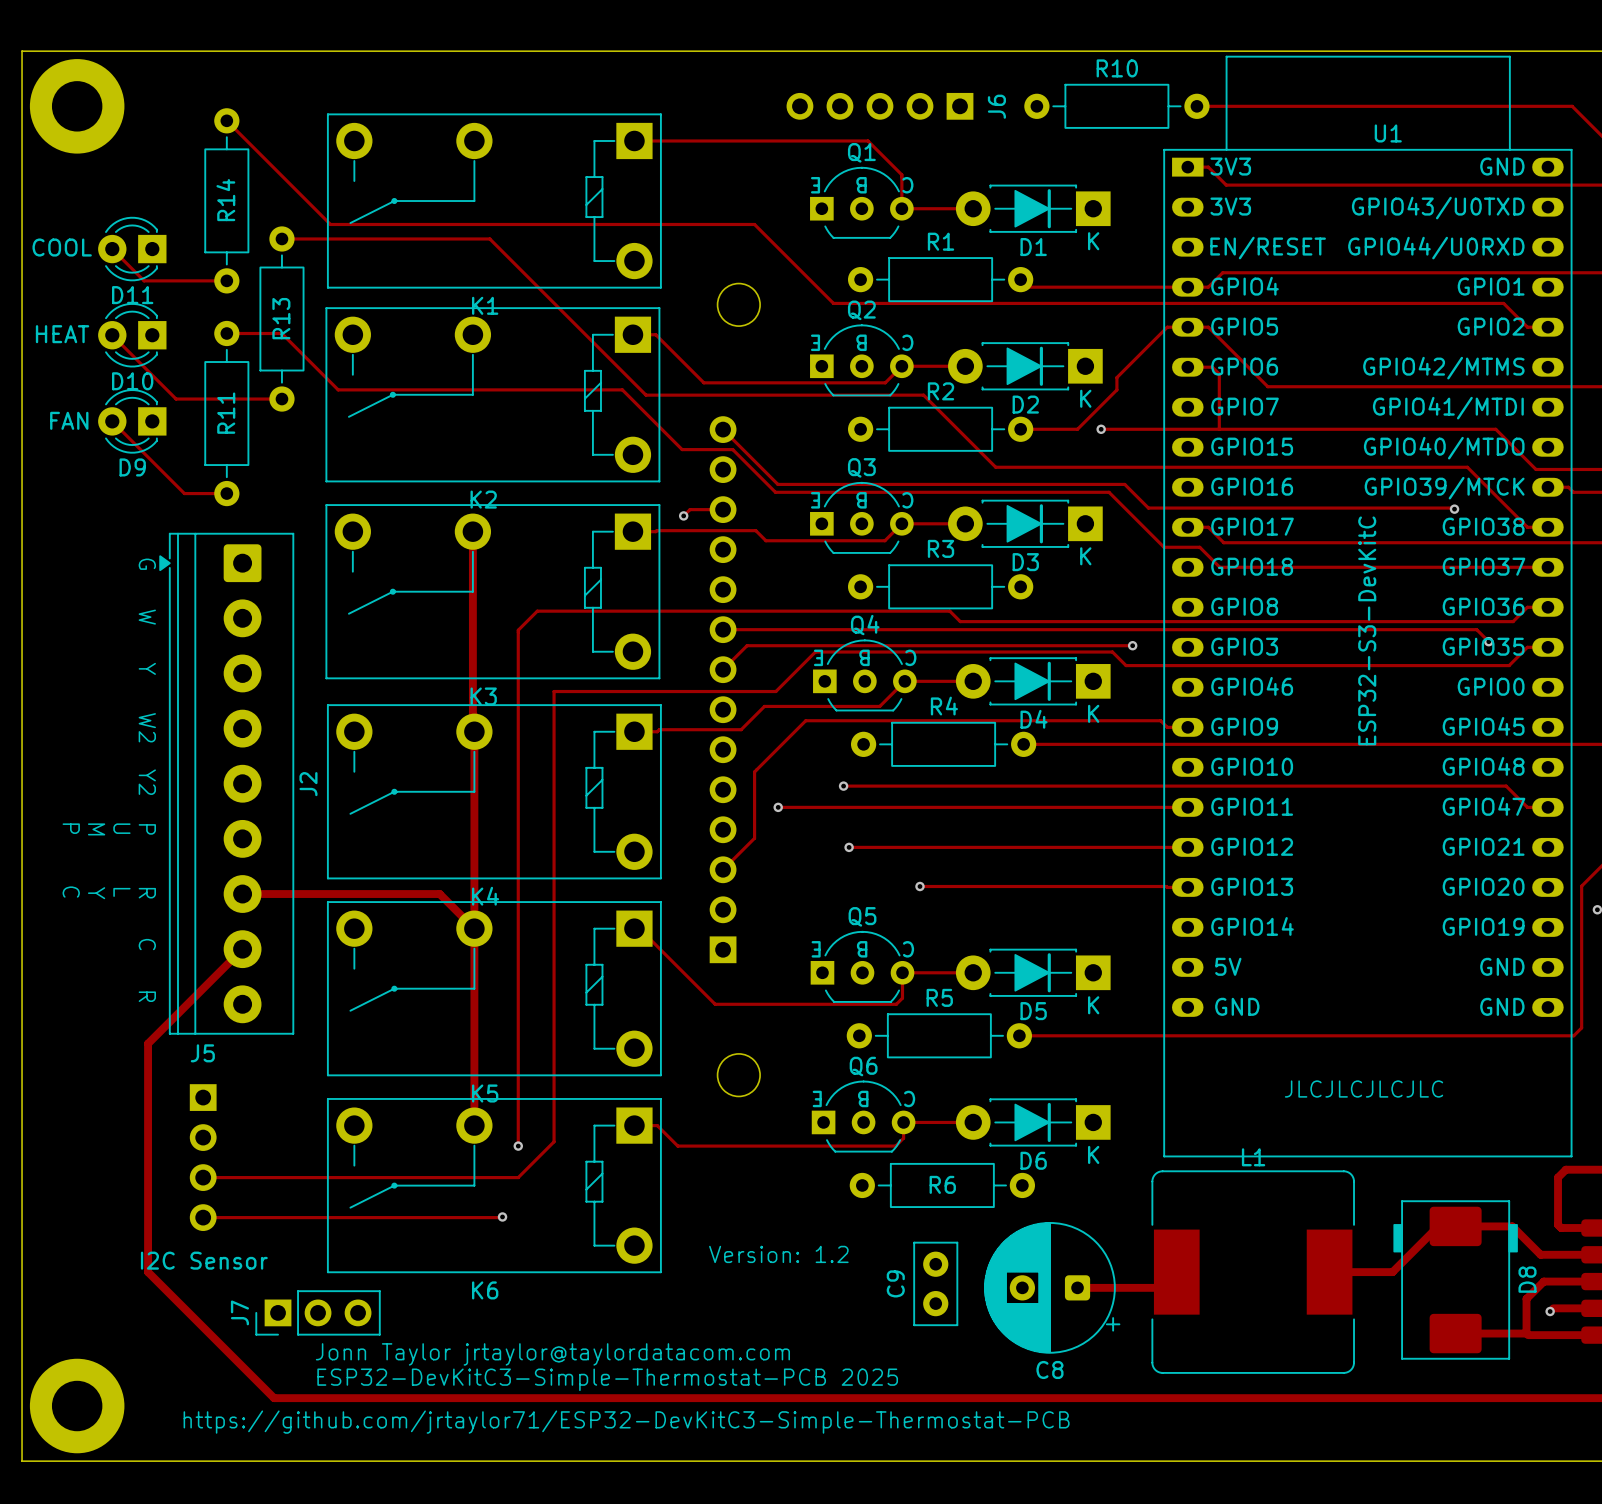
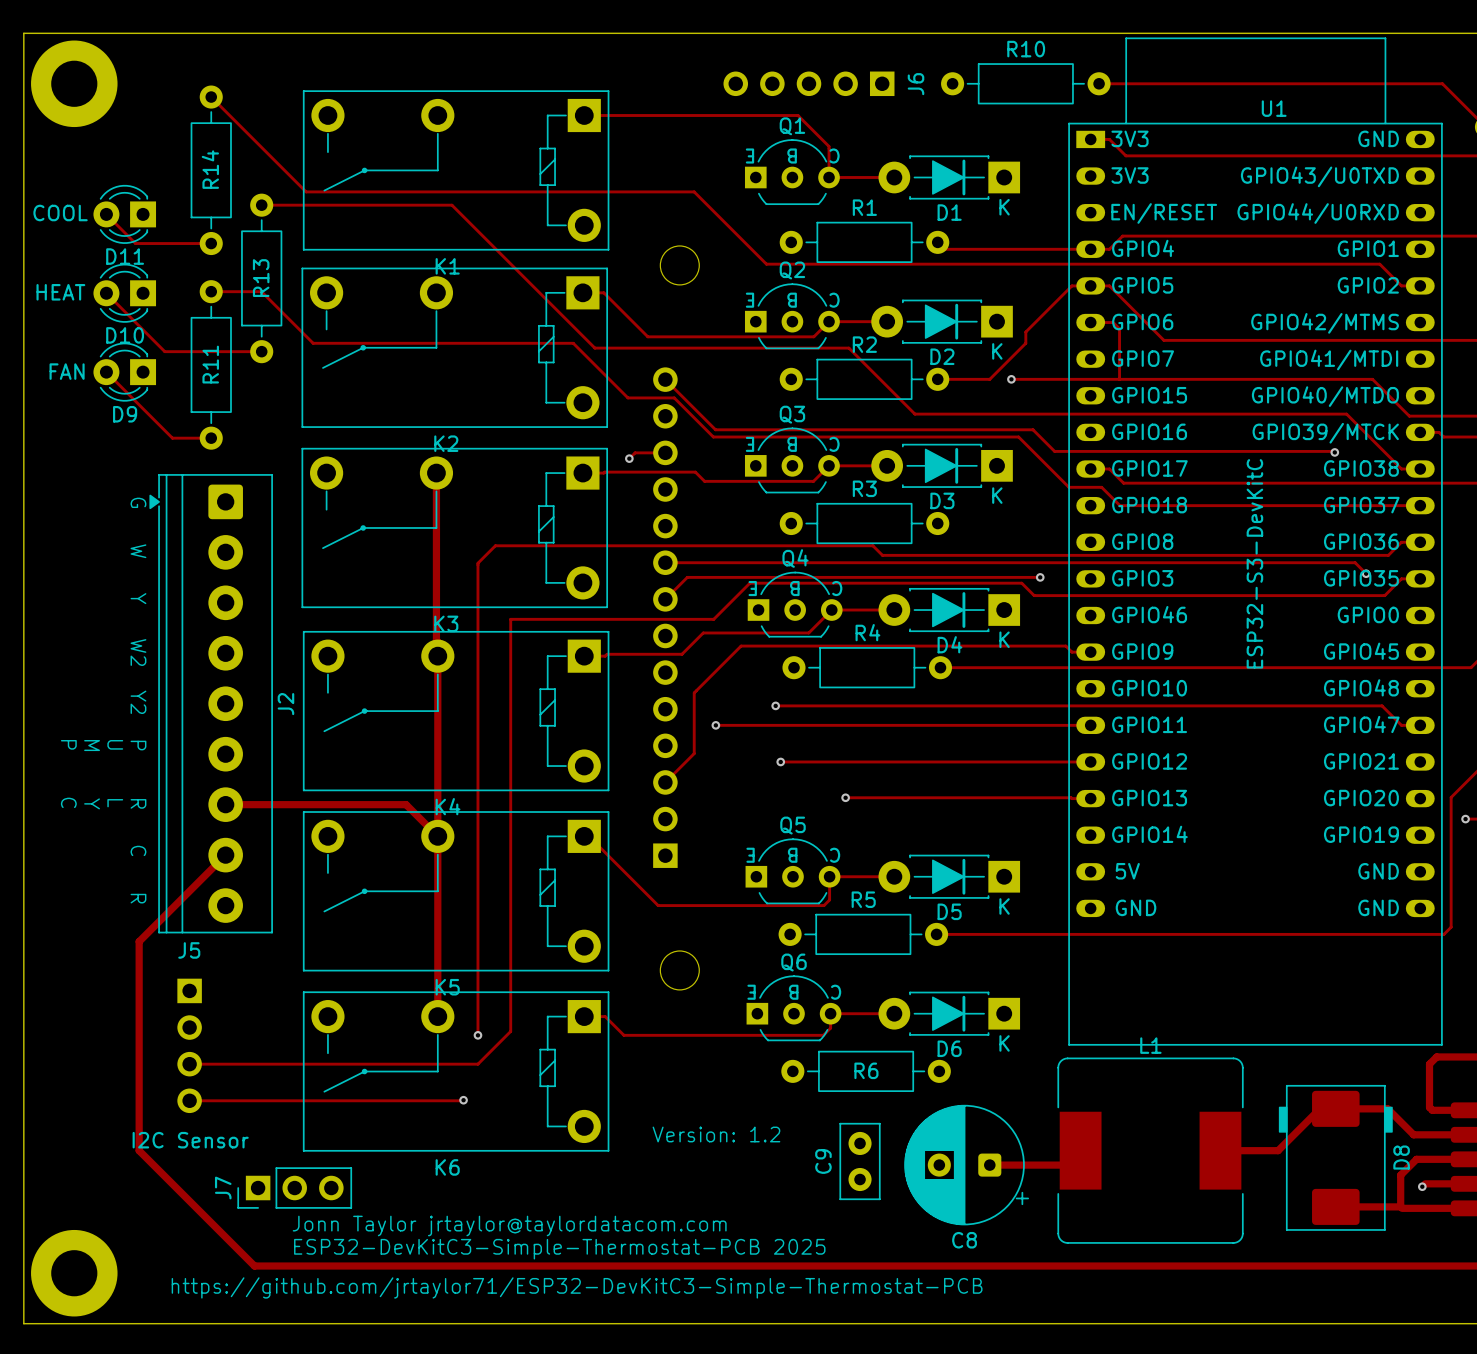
text: JLCJLCJLCJLC (1364, 1089) -> none

